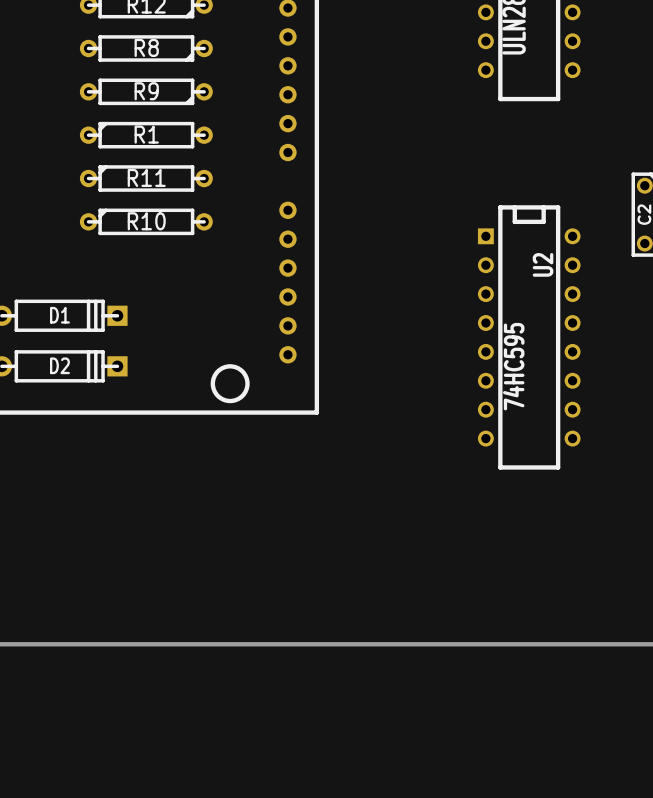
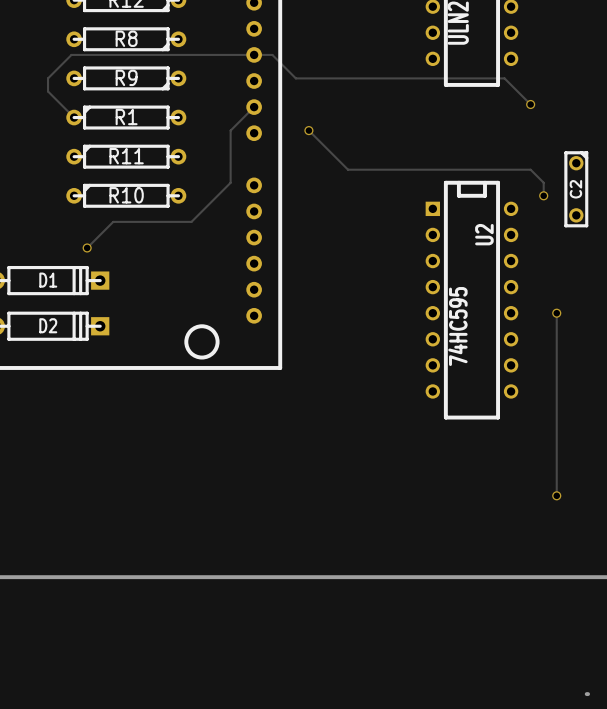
track: none -> (530, 104) (504, 78) (295, 78) (272, 54) (71, 54) (48, 78) (48, 91) (74, 117)
via: none -> (530, 104)
track: none -> (254, 107) (230, 130) (230, 182) (191, 221) (113, 221) (87, 247)
track: none -> (308, 130) (348, 169) (530, 169) (543, 182) (543, 195)
via: none -> (308, 130)
via: none -> (543, 195)
via: none -> (87, 247)
track: none -> (556, 313) (556, 495)
via: none -> (556, 313)
via: none -> (556, 495)

